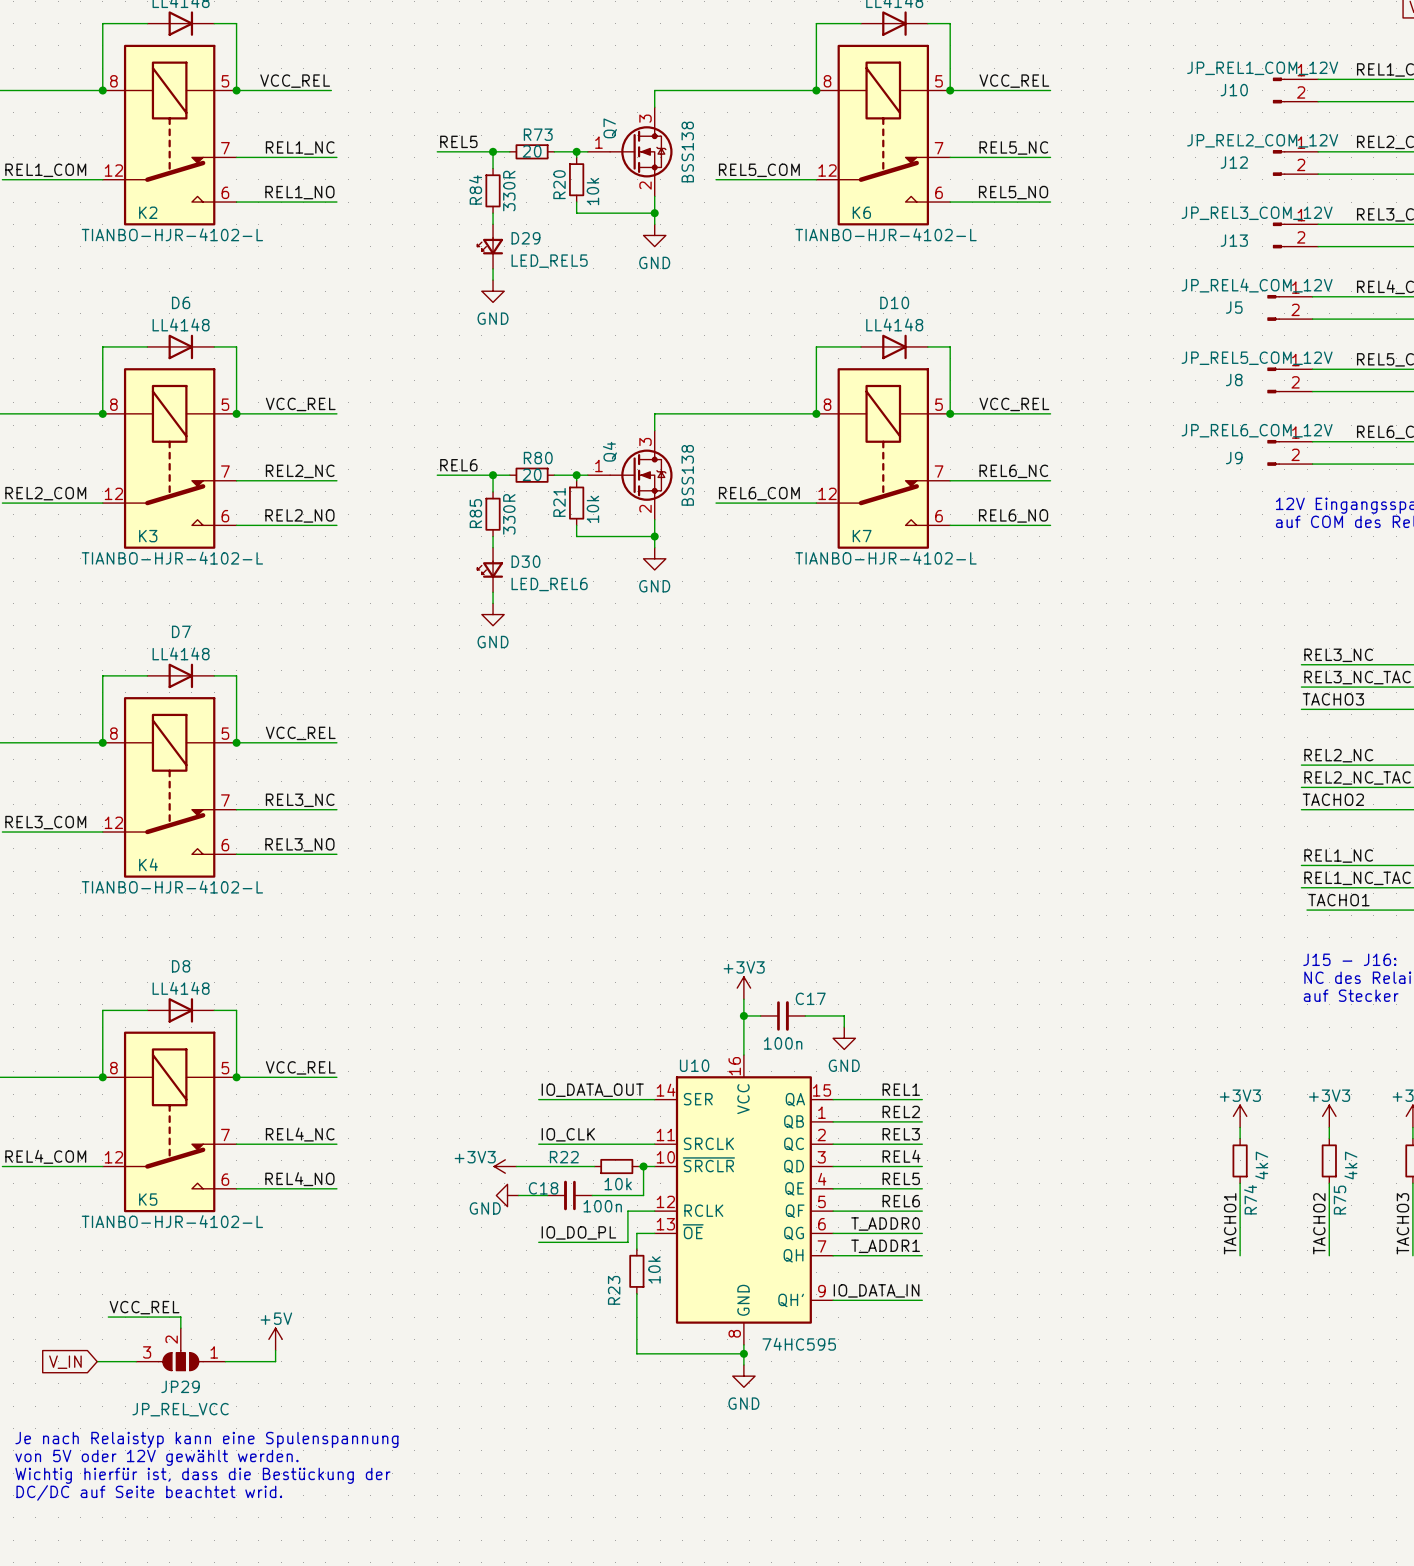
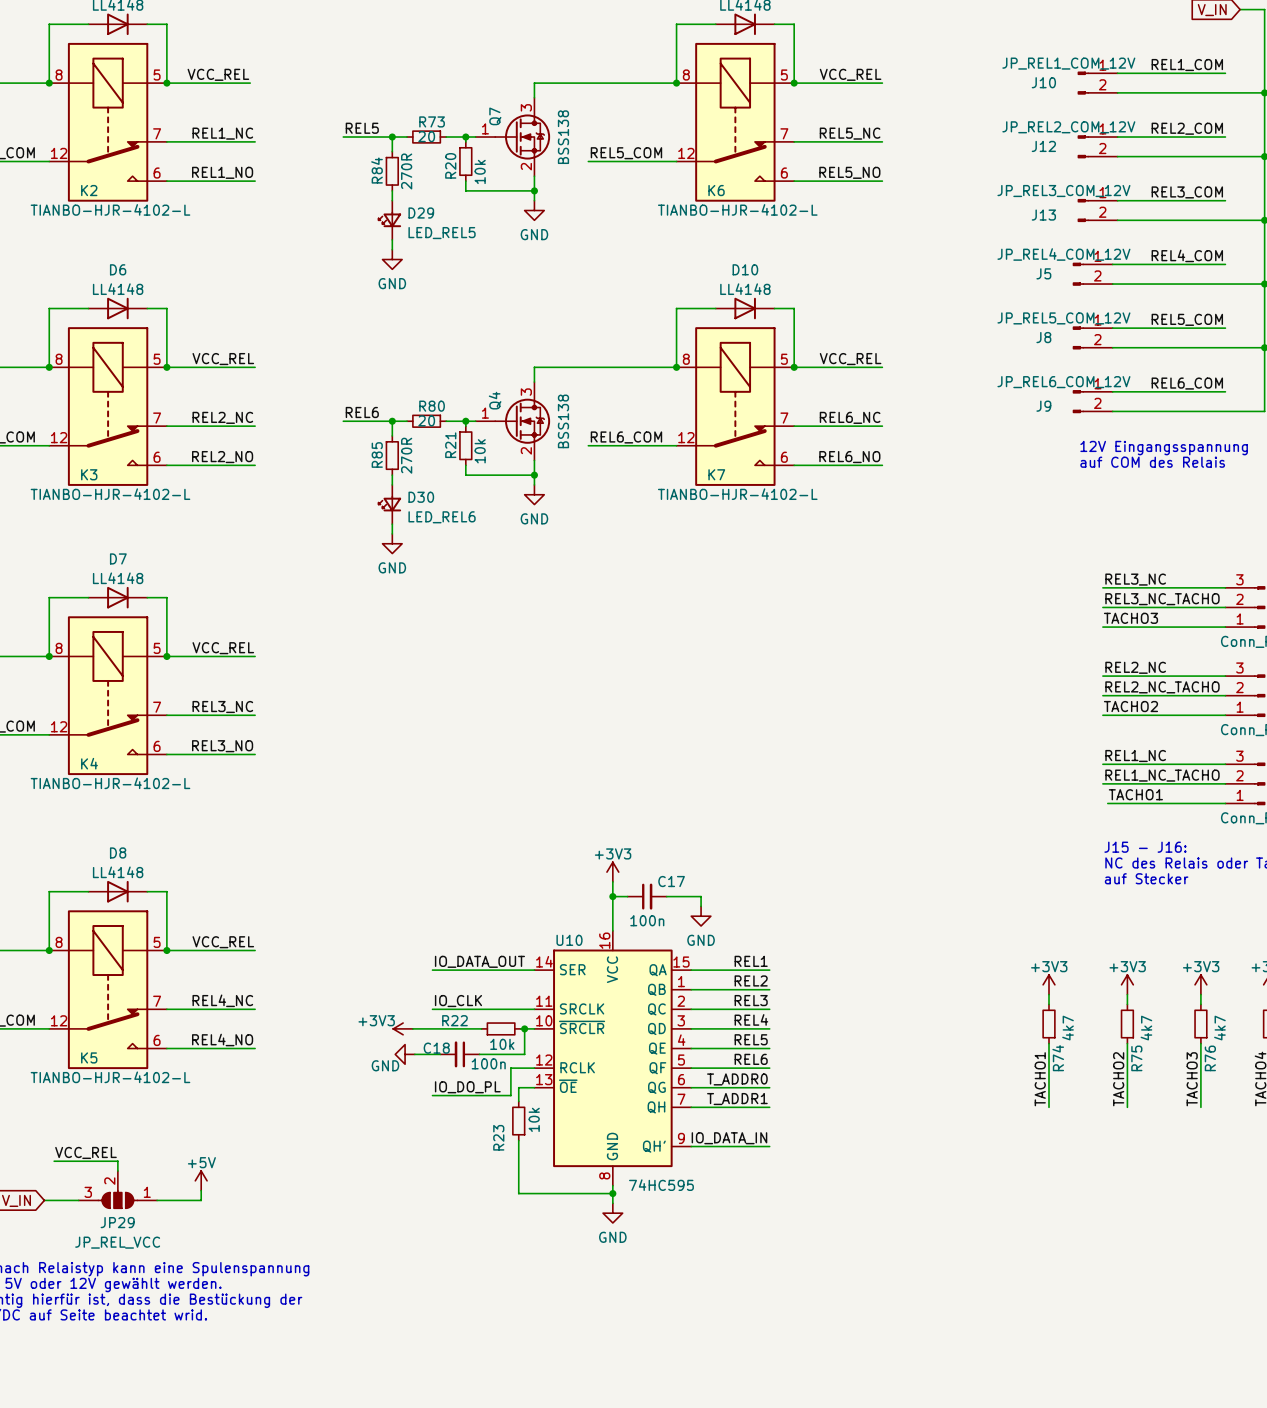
R84 value: 330R (509, 191) -> 270R (406, 171)
R85 value: 330R (509, 514) -> 270R (406, 455)

